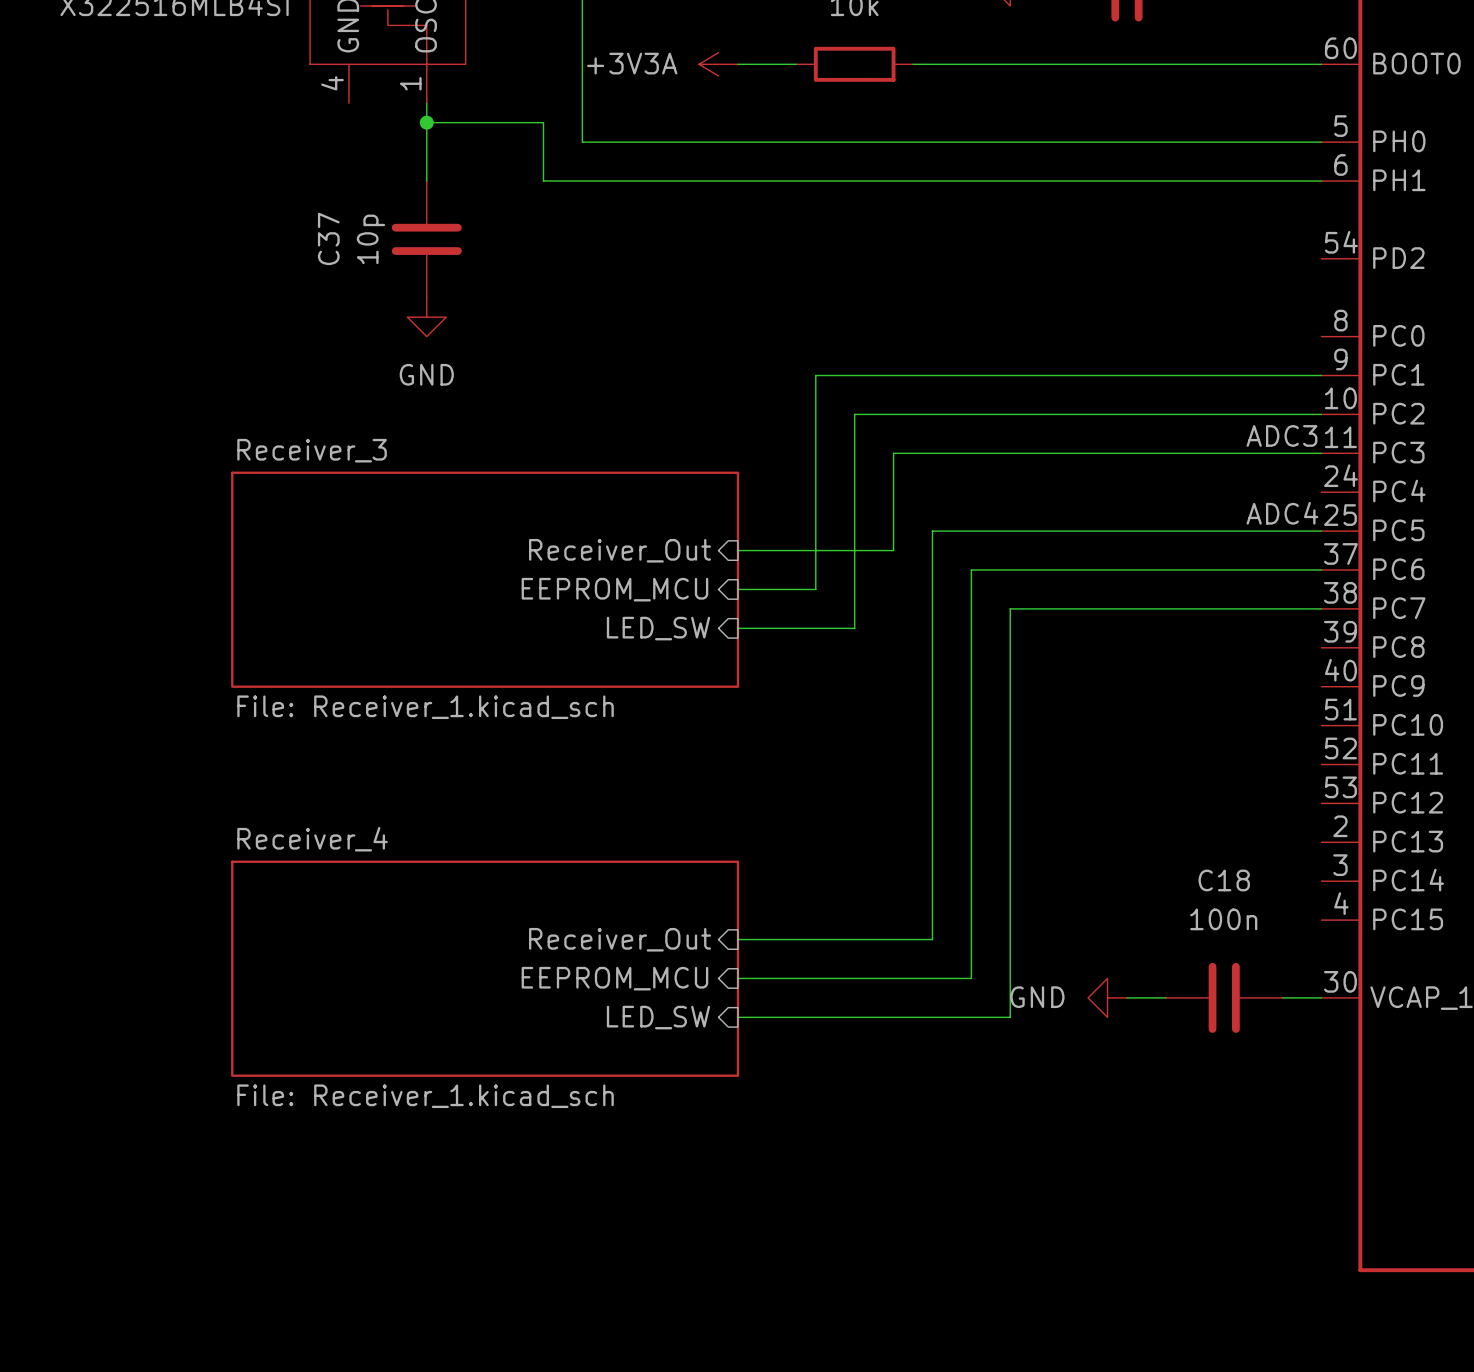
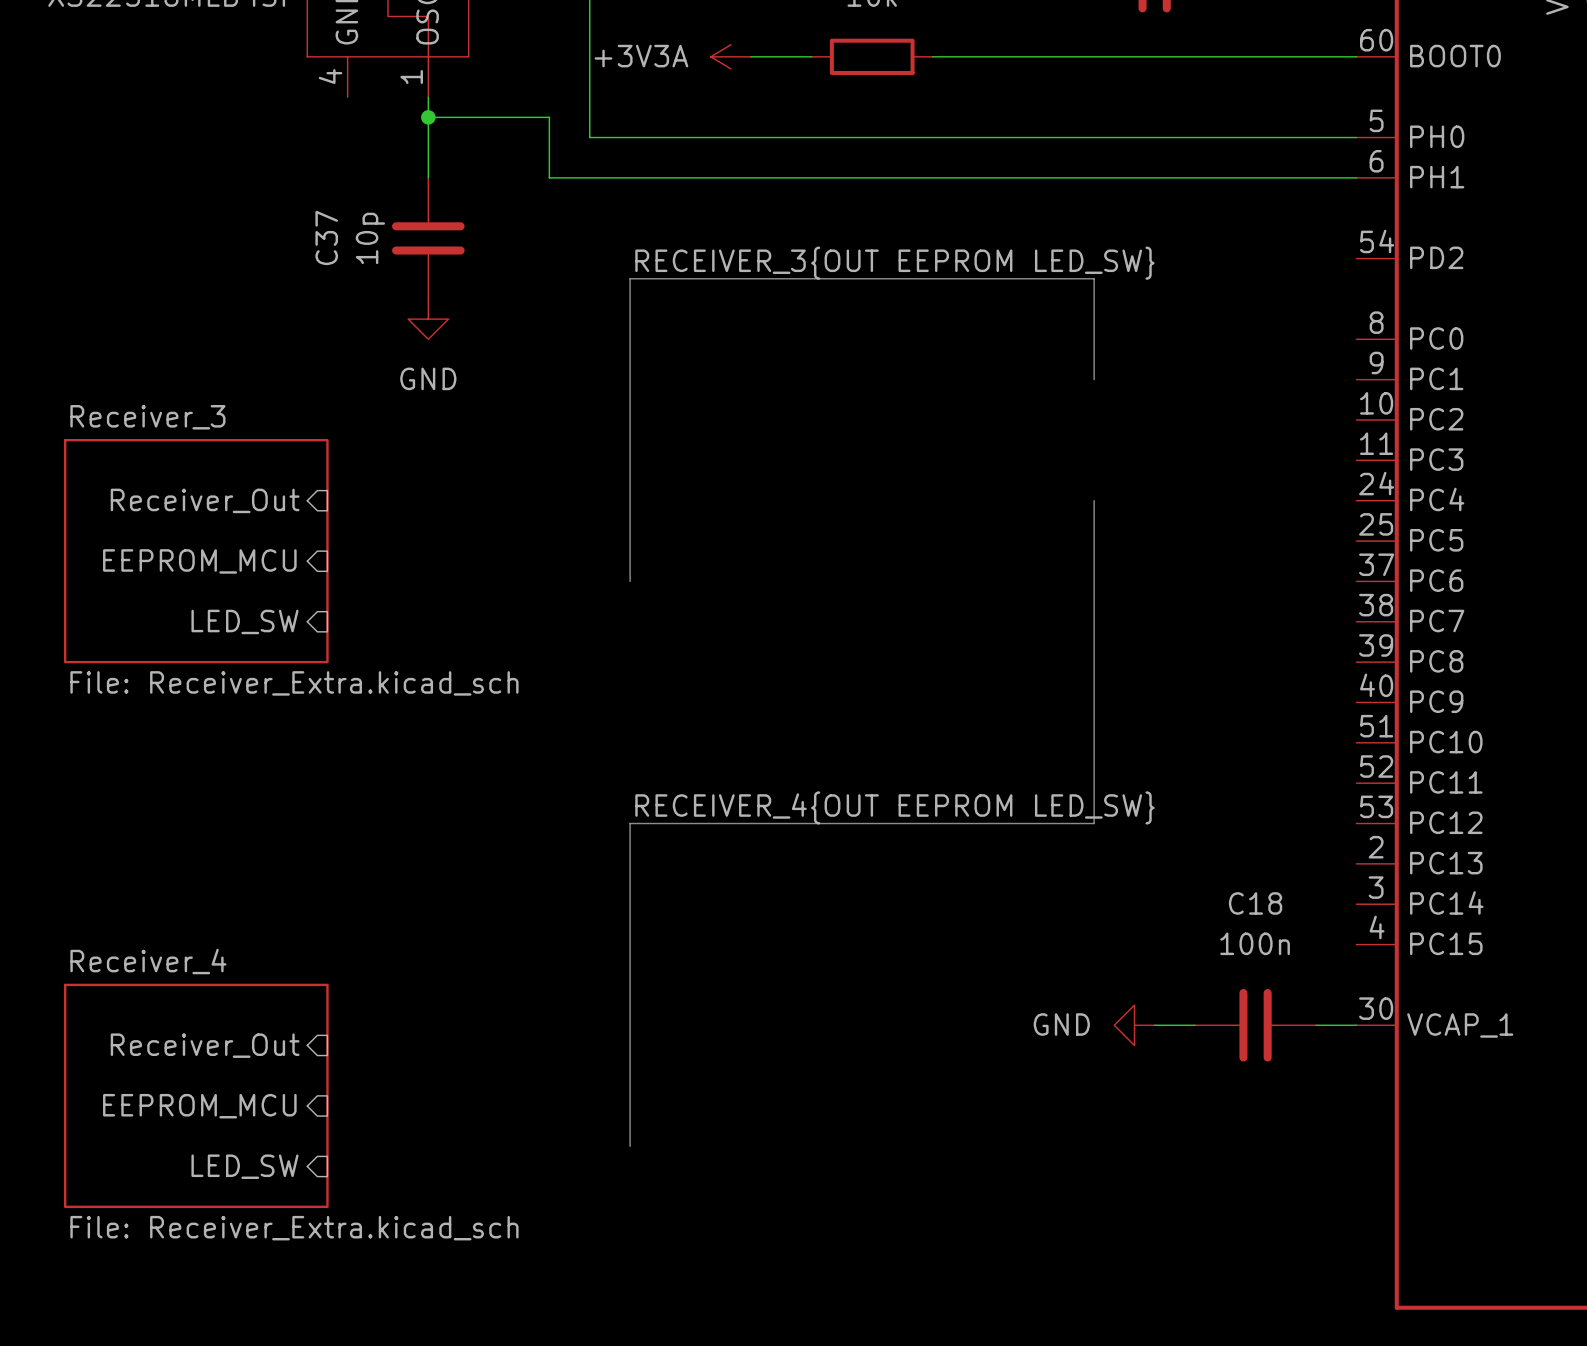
label: none -> RECEIVER_3{OUT EEPROM LED_SW} (894, 263)
bus: none -> (1094, 379) (1094, 278) (630, 278) (630, 581)
wire: (1321, 375) (815, 375) (815, 589) (737, 589) -> none
wire: (1321, 414) (854, 414) (854, 628) (737, 628) -> none
label: ADC3 (1281, 435) -> none
sheet Receiver_3 name position: Receiver_3 (312, 450) -> Receiver_3 (147, 417)
wire: (1321, 453) (893, 453) (893, 550) (737, 550) -> none
sheet Receiver_3 shape: [231, 471, 740, 688] -> [63, 438, 329, 664]
sheet pin: none -> Receiver_Out (205, 500)
bus: none -> (1094, 500) (1094, 823) (630, 823) (630, 1146)
label: ADC4 (1282, 513) -> none
wire: (1321, 531) (932, 531) (932, 939) (737, 939) -> none
sheet pin: none -> EEPROM_MCU (199, 561)
sheet pin: Receiver_Out (620, 550) -> none
wire: (1321, 570) (971, 570) (971, 978) (737, 978) -> none
sheet pin: EEPROM_MCU (614, 589) -> none
wire: (1321, 608) (1010, 608) (1010, 1017) (737, 1017) -> none
sheet pin: none -> LED_SW (244, 621)
sheet pin: LED_SW (658, 628) -> none
sheet Receiver_3 value: File: Receiver_1.kicad_sch (425, 707) -> File: Receiver_Extra.kicad_sch (294, 683)
label: none -> RECEIVER_4{OUT EEPROM LED_SW} (894, 807)
sheet Receiver_4 name position: Receiver_4 (312, 839) -> Receiver_4 (148, 961)
sheet Receiver_4 shape: [231, 860, 740, 1077] -> [63, 983, 329, 1209]
sheet pin: Receiver_Out (620, 939) -> none
sheet pin: EEPROM_MCU (614, 978) -> none
sheet pin: none -> Receiver_Out (205, 1045)
sheet pin: LED_SW (658, 1017) -> none
sheet pin: none -> EEPROM_MCU (199, 1106)
sheet Receiver_4 value: File: Receiver_1.kicad_sch (425, 1096) -> File: Receiver_Extra.kicad_sch (294, 1228)
sheet pin: none -> LED_SW (244, 1166)

